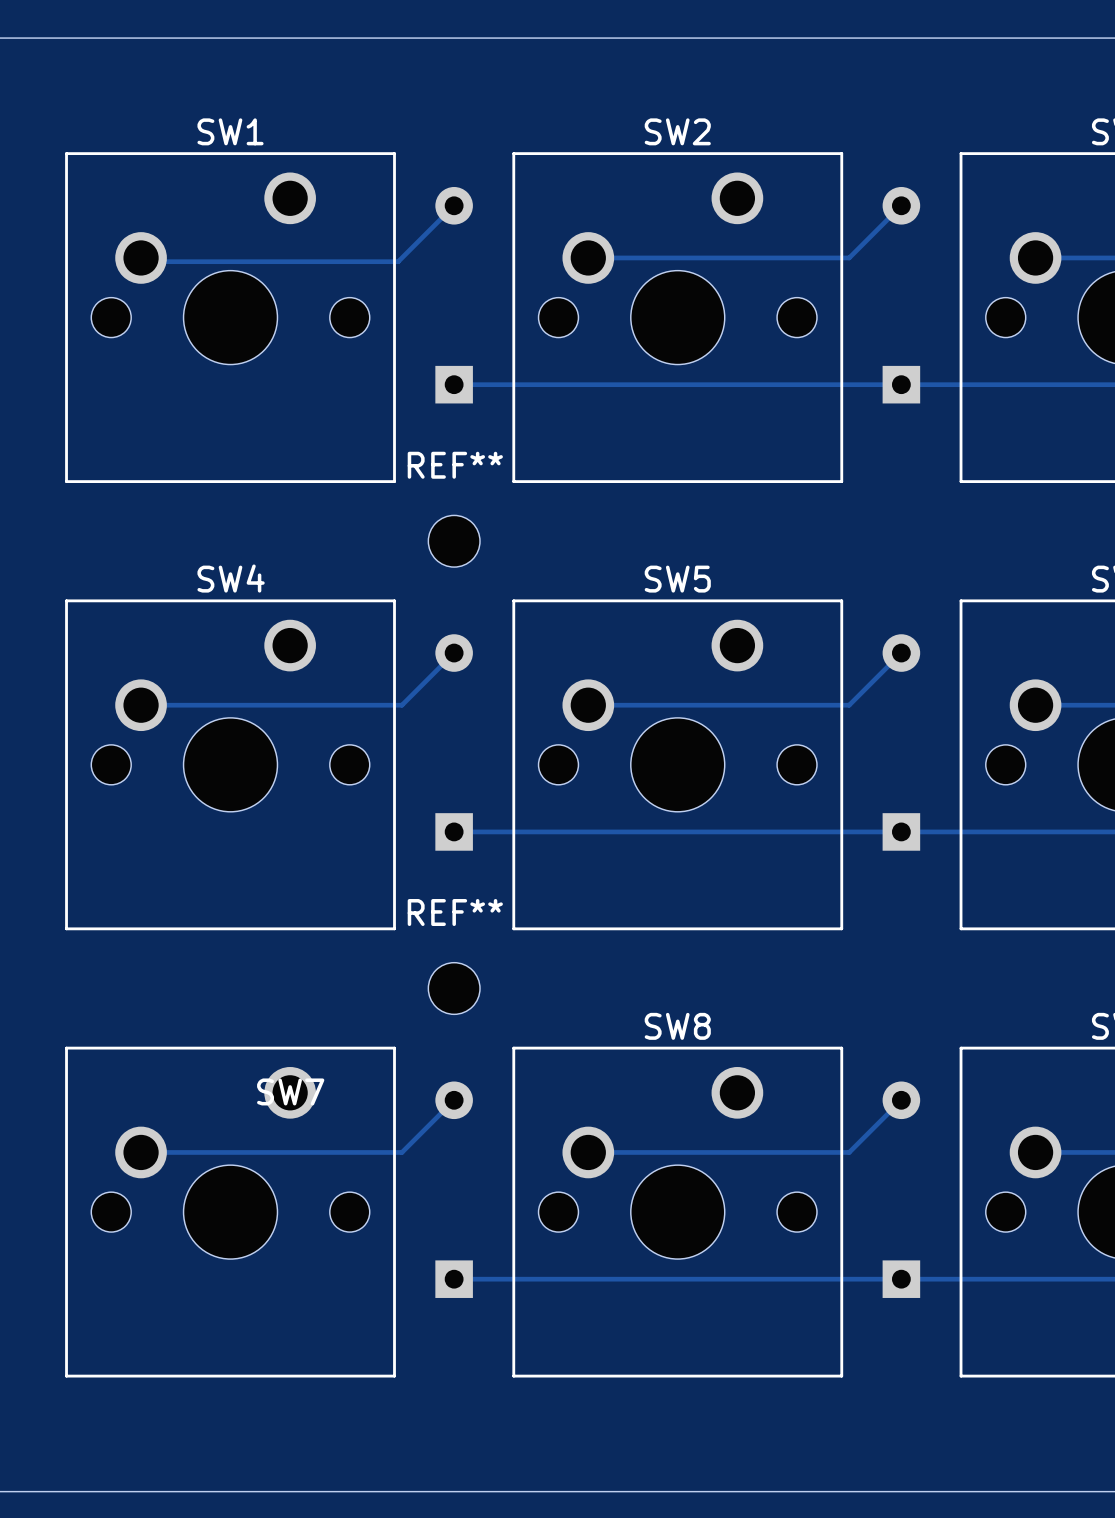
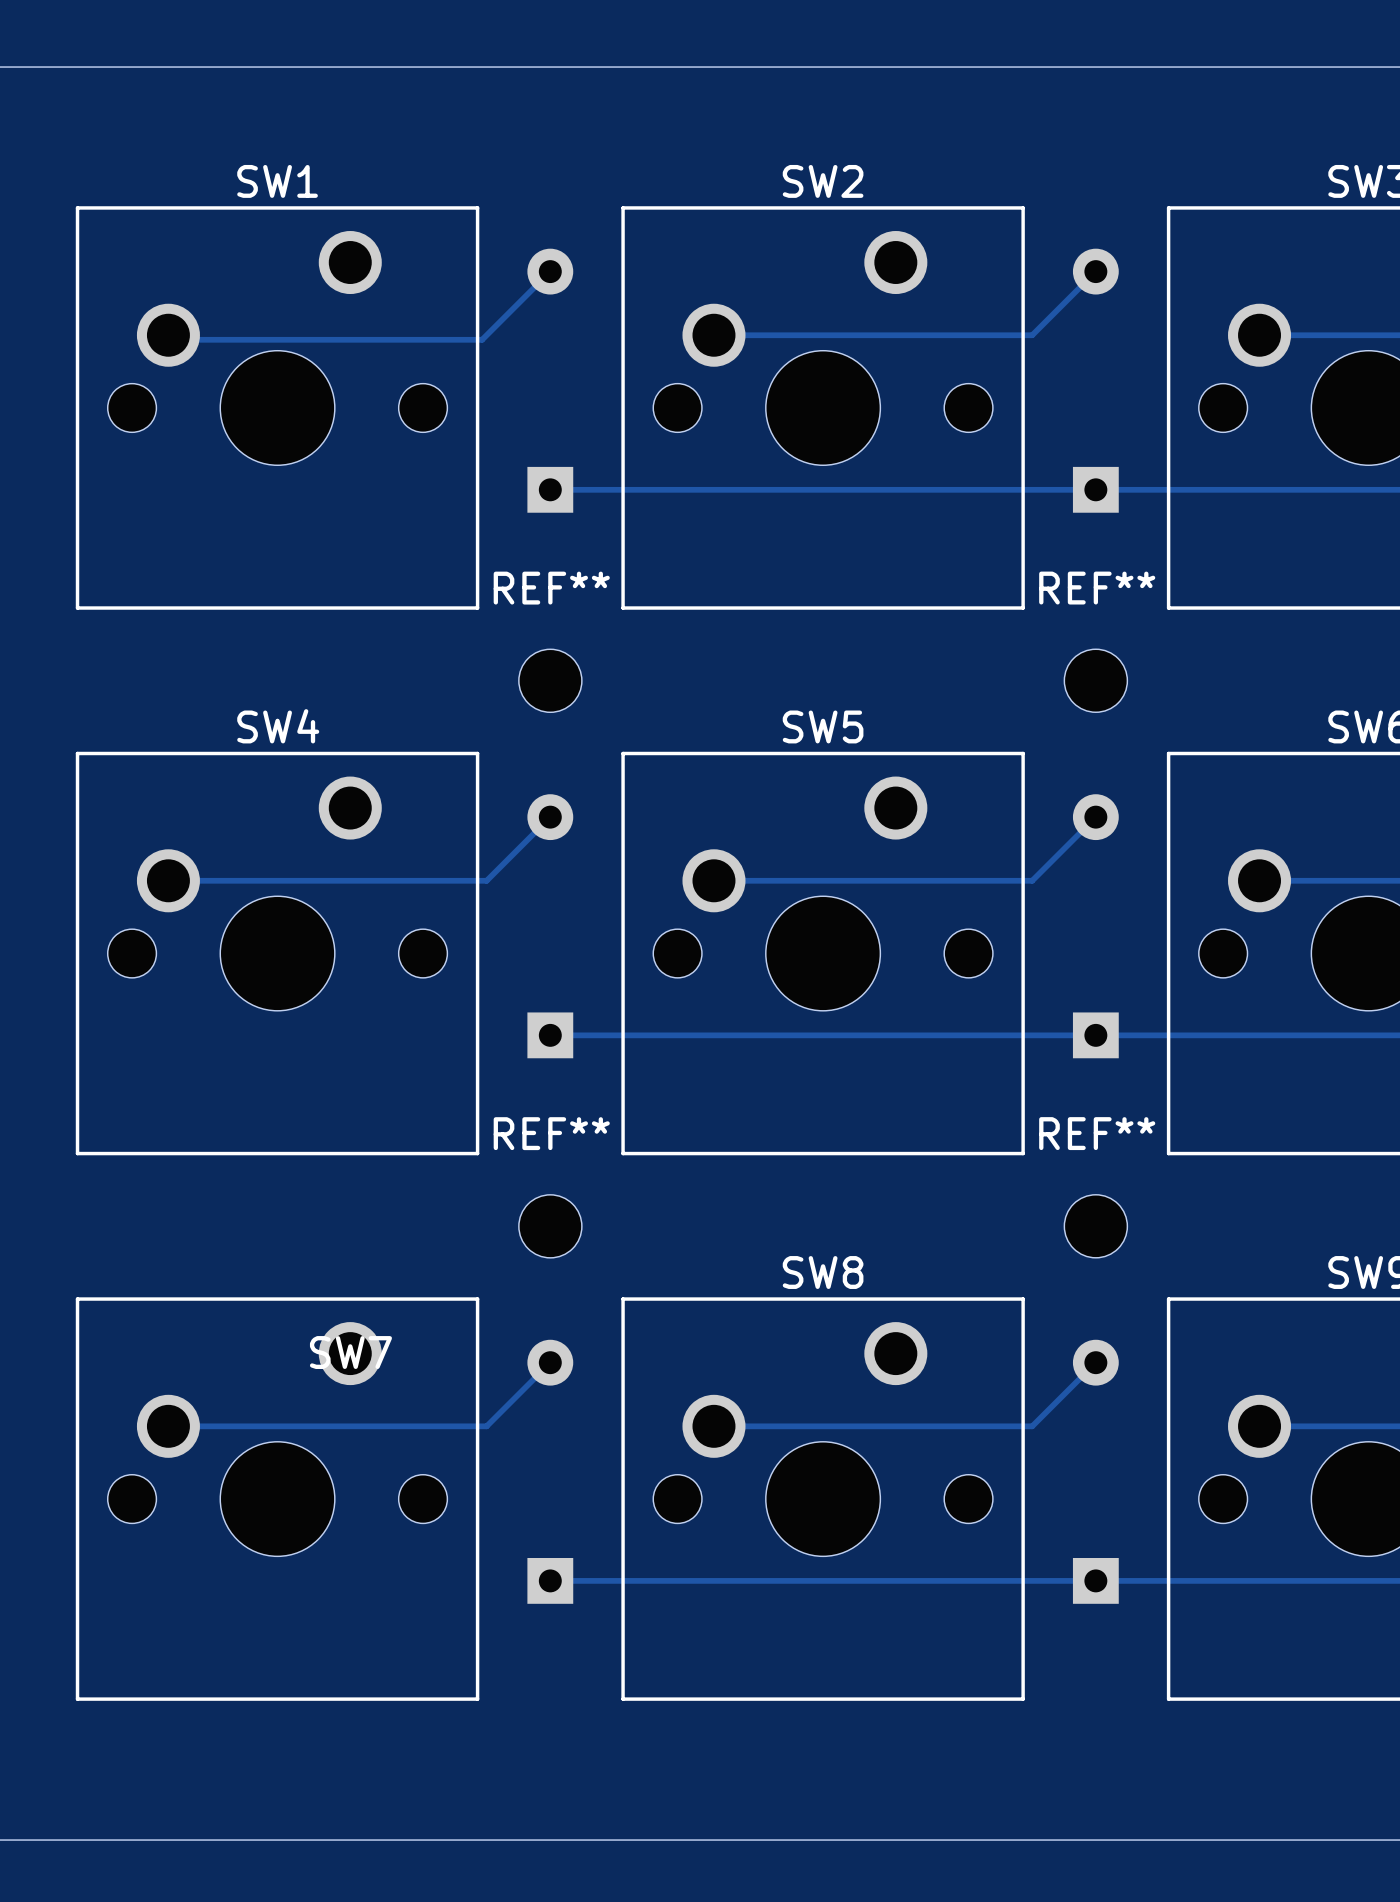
REF**: none -> (1095, 680)
REF**: none -> (1095, 1226)

